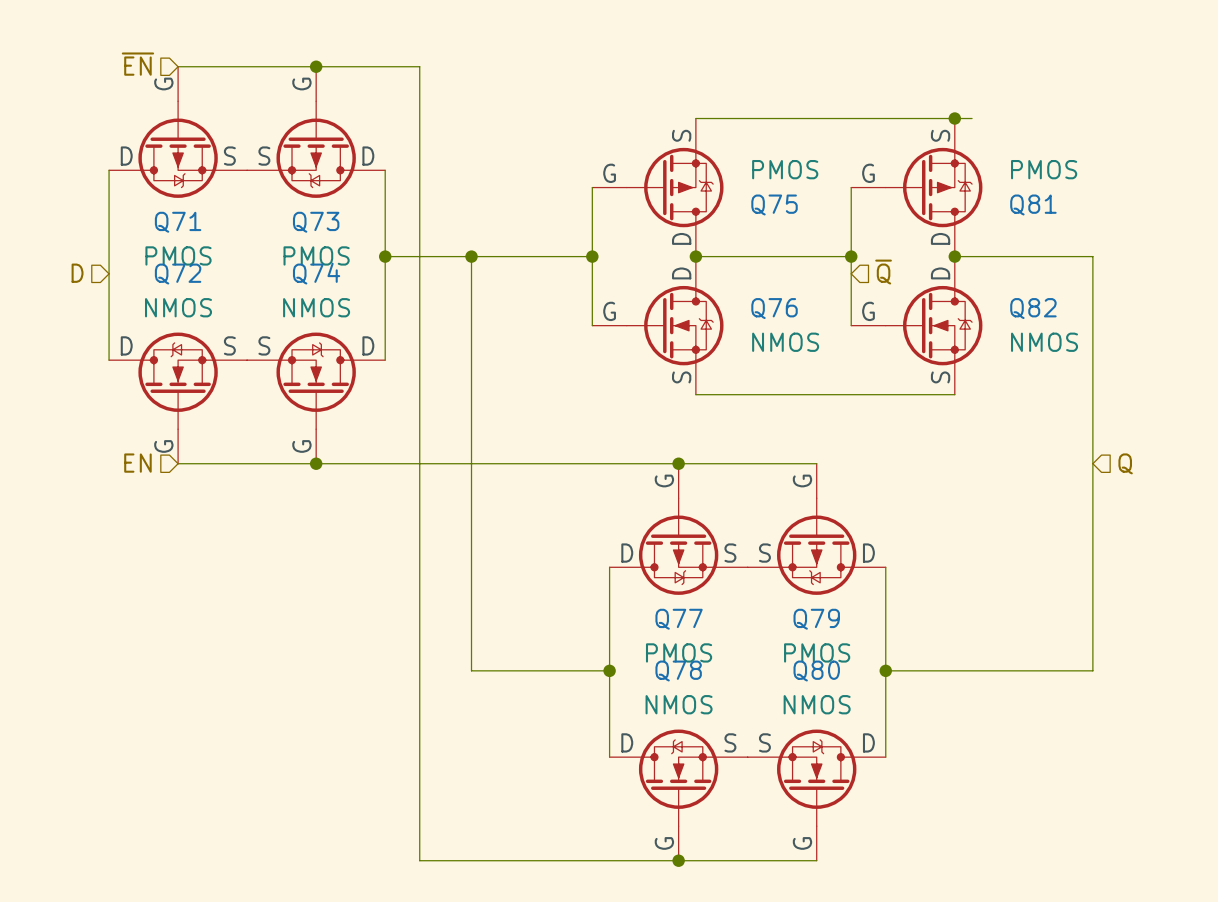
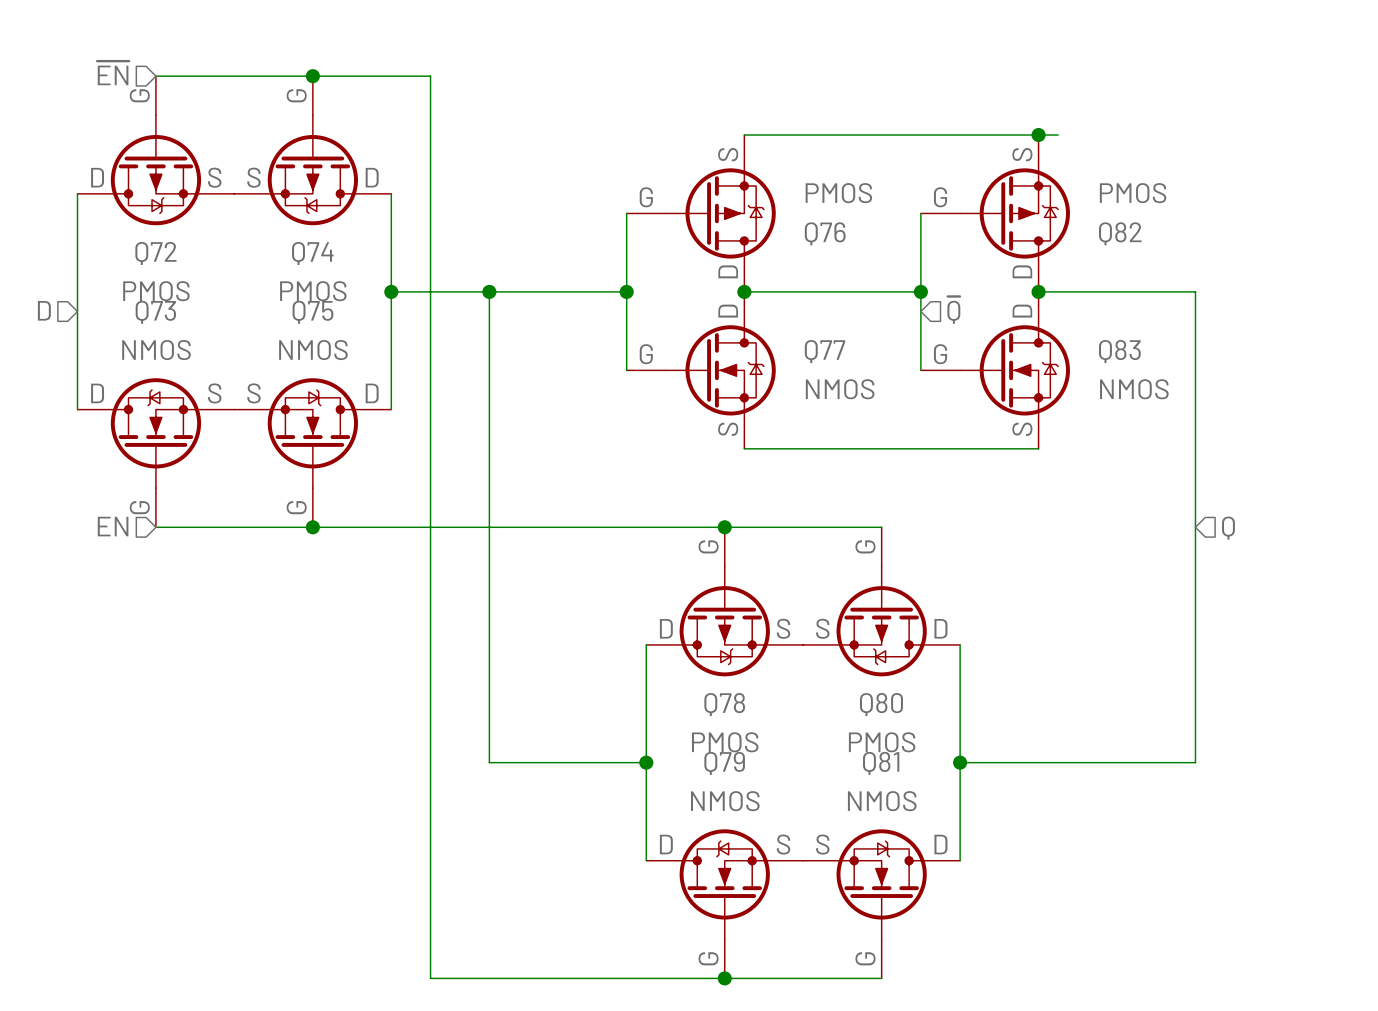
Q75 name: Q75 (774, 204) -> Q76 (825, 233)
Q81 name: Q81 (1033, 204) -> Q82 (1120, 233)
Q71 name: Q71 (178, 222) -> Q72 (155, 253)
Q73 name: Q73 (316, 222) -> Q74 (312, 253)
Q74 name: Q74 (316, 273) -> Q75 (312, 312)
Q72 name: Q72 (178, 274) -> Q73 (155, 312)
Q76 name: Q76 (774, 308) -> Q77 (825, 351)
Q82 name: Q82 (1033, 308) -> Q83 (1119, 351)
Q77 name: Q77 (679, 619) -> Q78 (724, 704)
Q79 name: Q79 (816, 619) -> Q80 (881, 704)
Q78 name: Q78 (678, 671) -> Q79 (724, 763)
Q80 name: Q80 (816, 671) -> Q81 (881, 763)

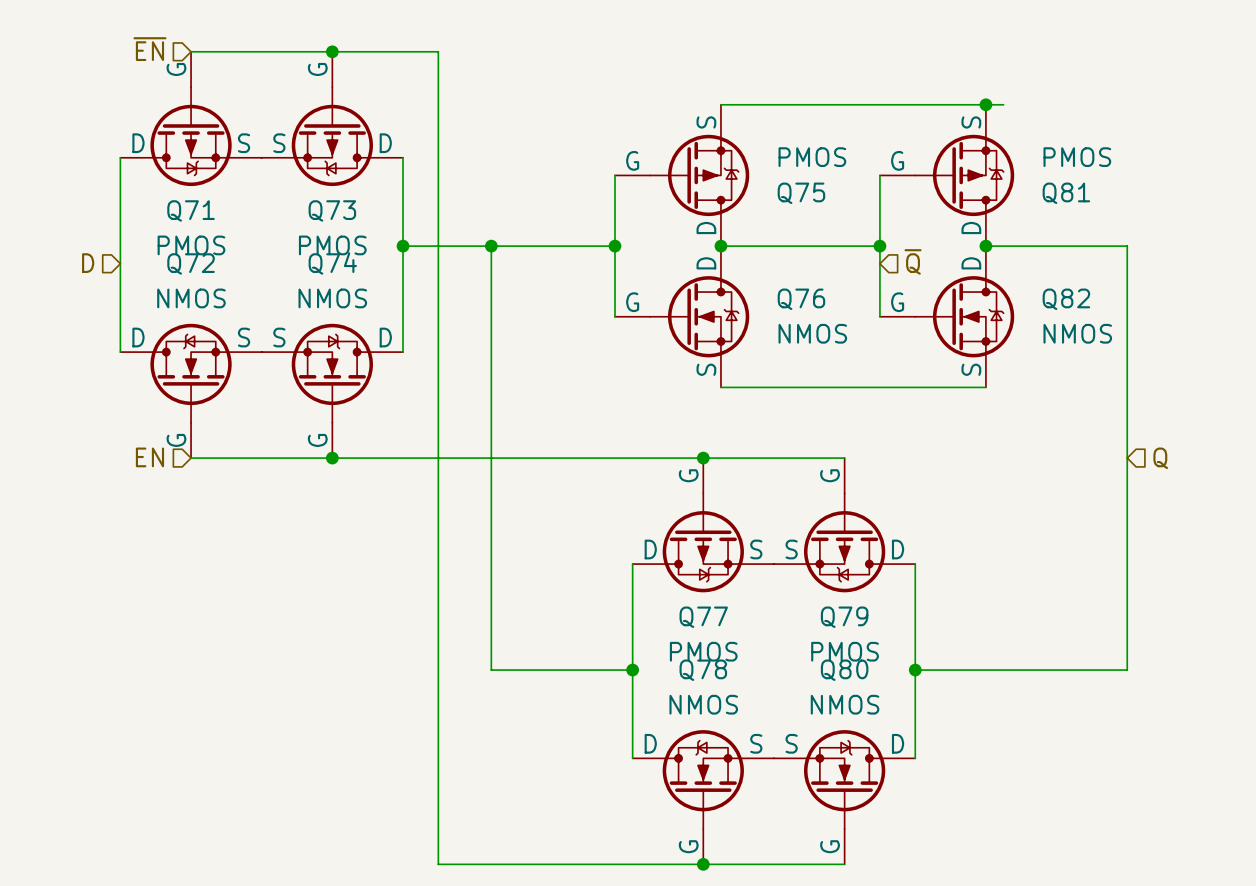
Q76 name: Q76 (825, 233) -> Q75 (801, 193)
Q82 name: Q82 (1120, 233) -> Q81 (1066, 193)
Q72 name: Q72 (155, 253) -> Q71 (191, 210)
Q74 name: Q74 (312, 253) -> Q73 (332, 210)
Q73 name: Q73 (155, 312) -> Q72 (191, 263)
Q75 name: Q75 (312, 312) -> Q74 (332, 263)
Q77 name: Q77 (825, 351) -> Q76 (801, 299)
Q83 name: Q83 (1119, 351) -> Q82 (1066, 299)
Q78 name: Q78 (724, 704) -> Q77 (703, 617)
Q80 name: Q80 (881, 704) -> Q79 (844, 617)
Q79 name: Q79 (724, 763) -> Q78 (703, 670)
Q81 name: Q81 (881, 763) -> Q80 (844, 670)

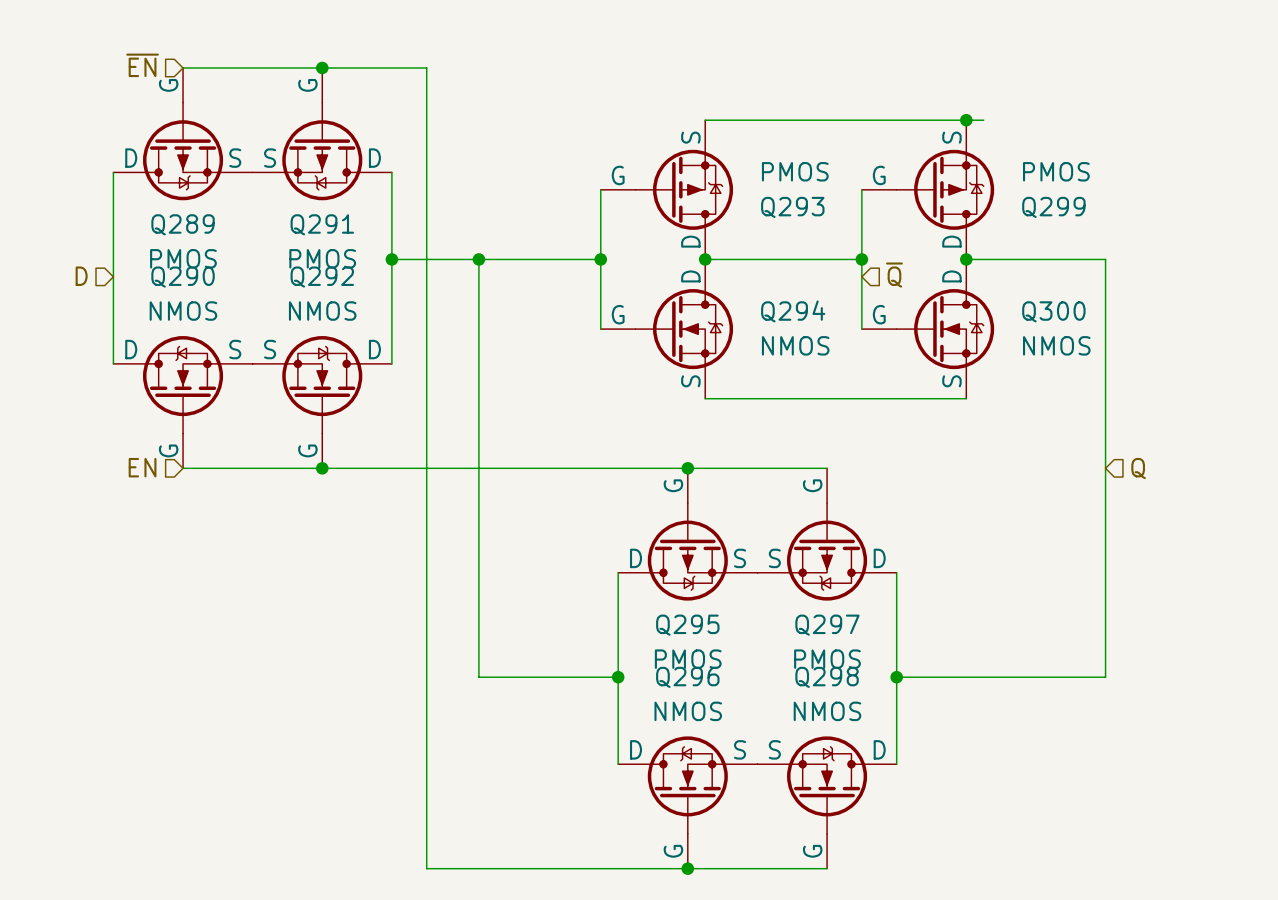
Q75 name: Q75 (801, 193) -> Q293 (792, 207)
Q81 name: Q81 (1066, 193) -> Q299 (1053, 207)
Q71 name: Q71 (191, 210) -> Q289 (183, 224)
Q73 name: Q73 (332, 210) -> Q291 (322, 224)
Q72 name: Q72 (191, 263) -> Q290 (183, 277)
Q74 name: Q74 (332, 263) -> Q292 (322, 277)
Q76 name: Q76 (801, 299) -> Q294 (793, 311)
Q82 name: Q82 (1066, 299) -> Q300 (1053, 311)
Q77 name: Q77 (703, 617) -> Q295 (687, 625)
Q79 name: Q79 (844, 617) -> Q297 (827, 625)
Q78 name: Q78 (703, 670) -> Q296 (687, 677)
Q80 name: Q80 (844, 670) -> Q298 (827, 677)

